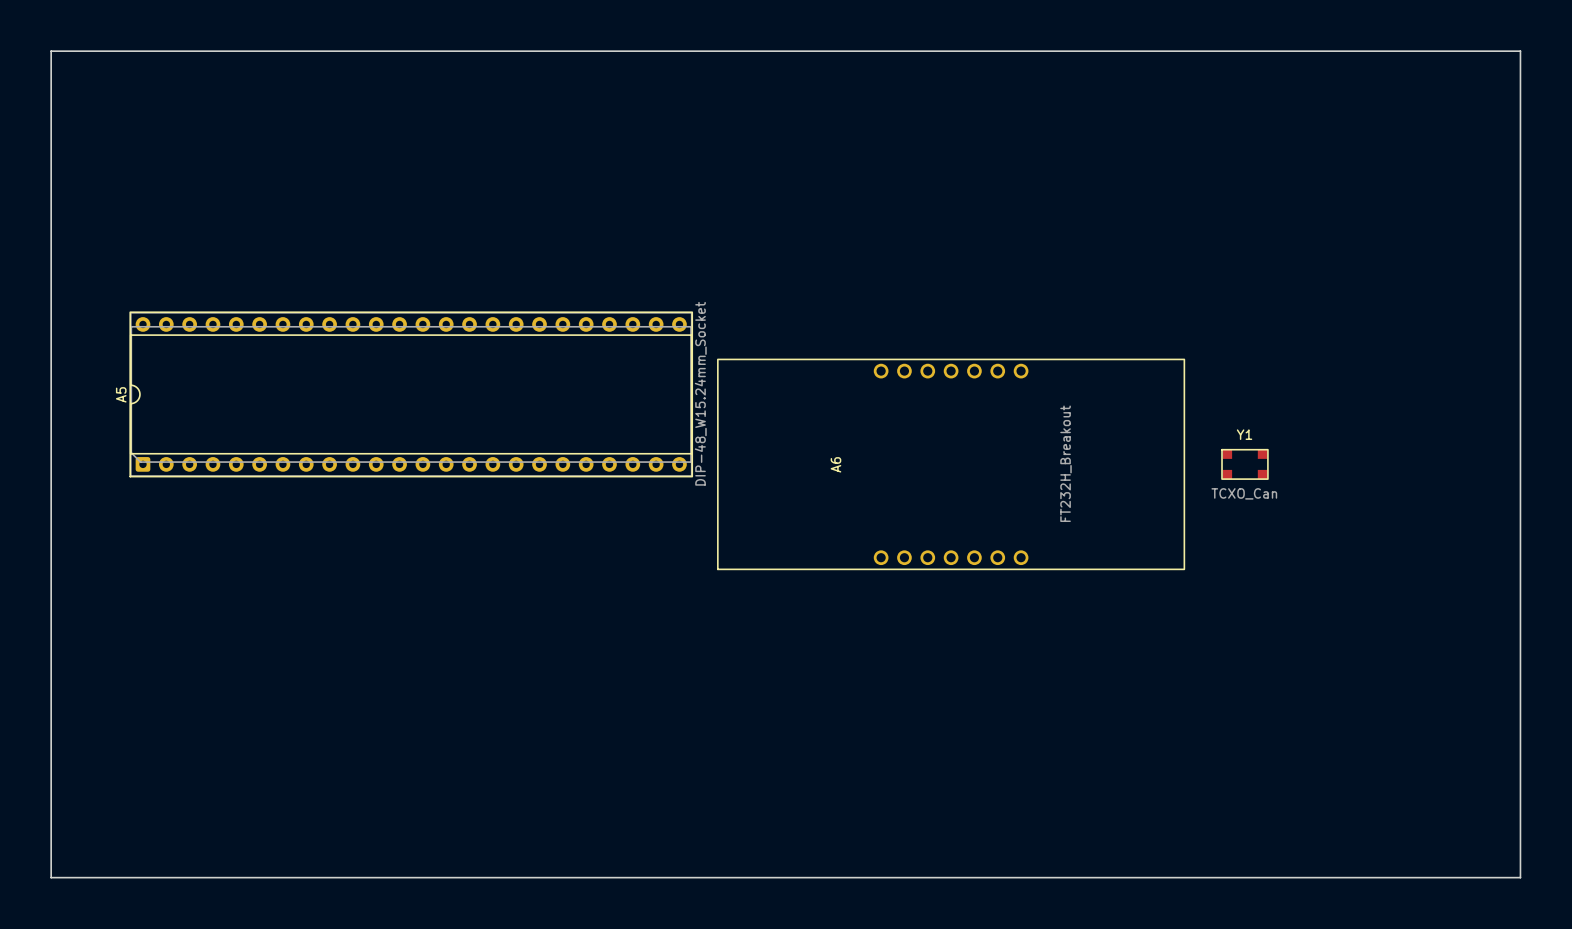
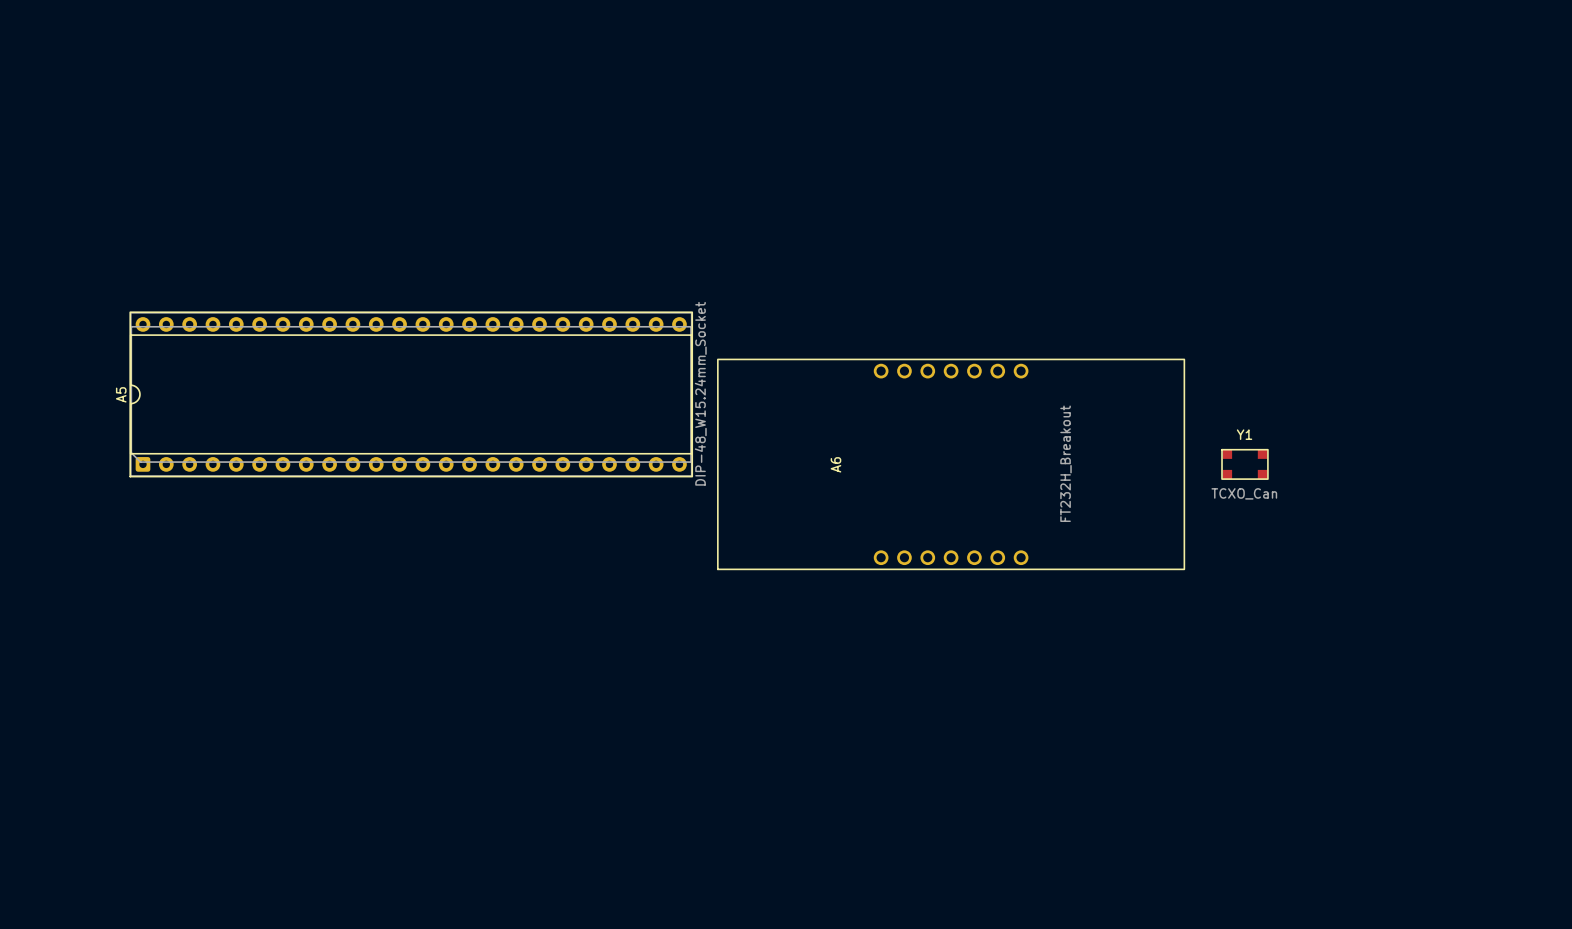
board edge: (51, 51) (1520, 51) (1520, 877) (51, 877) (51, 51) -> none

